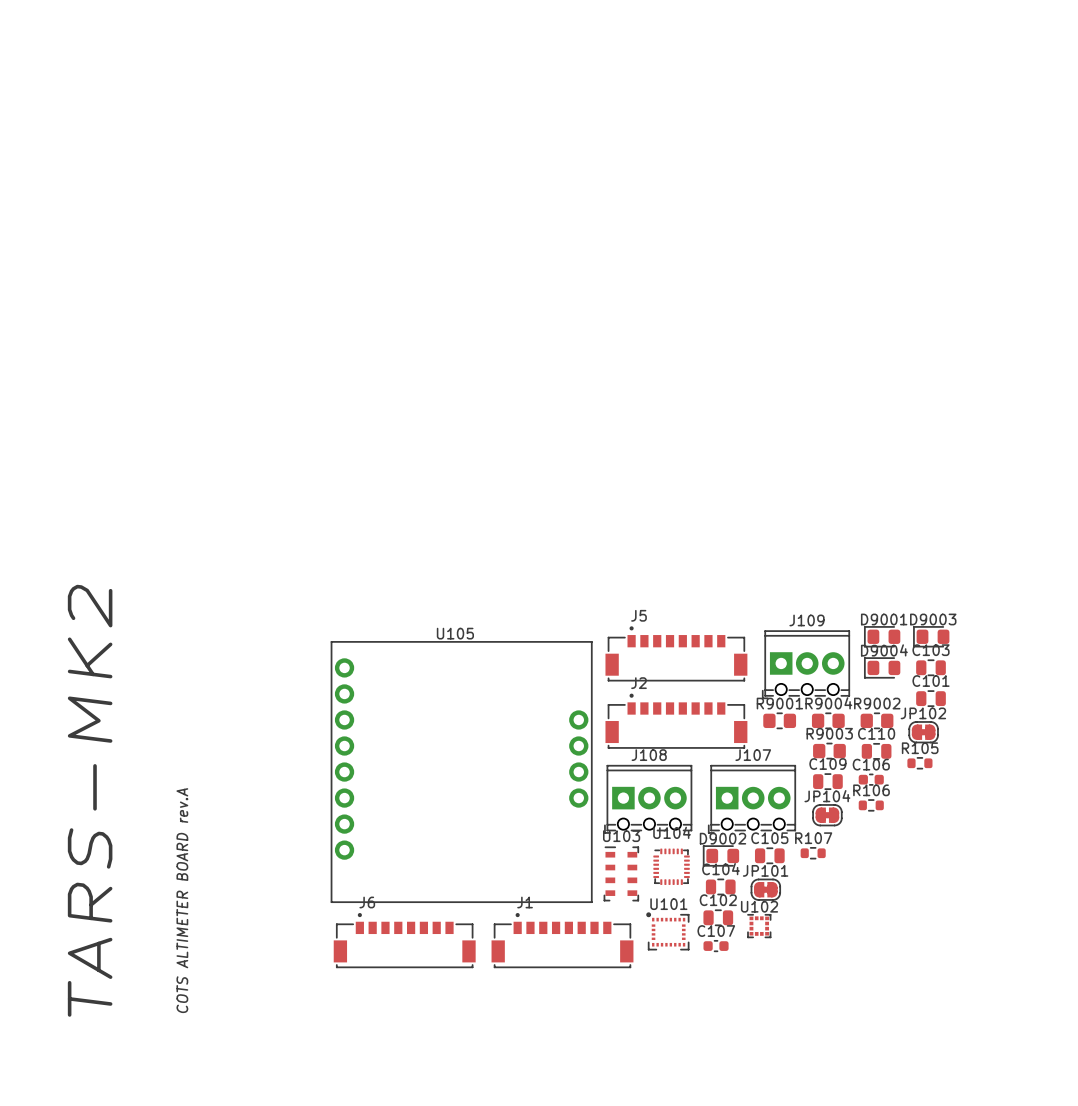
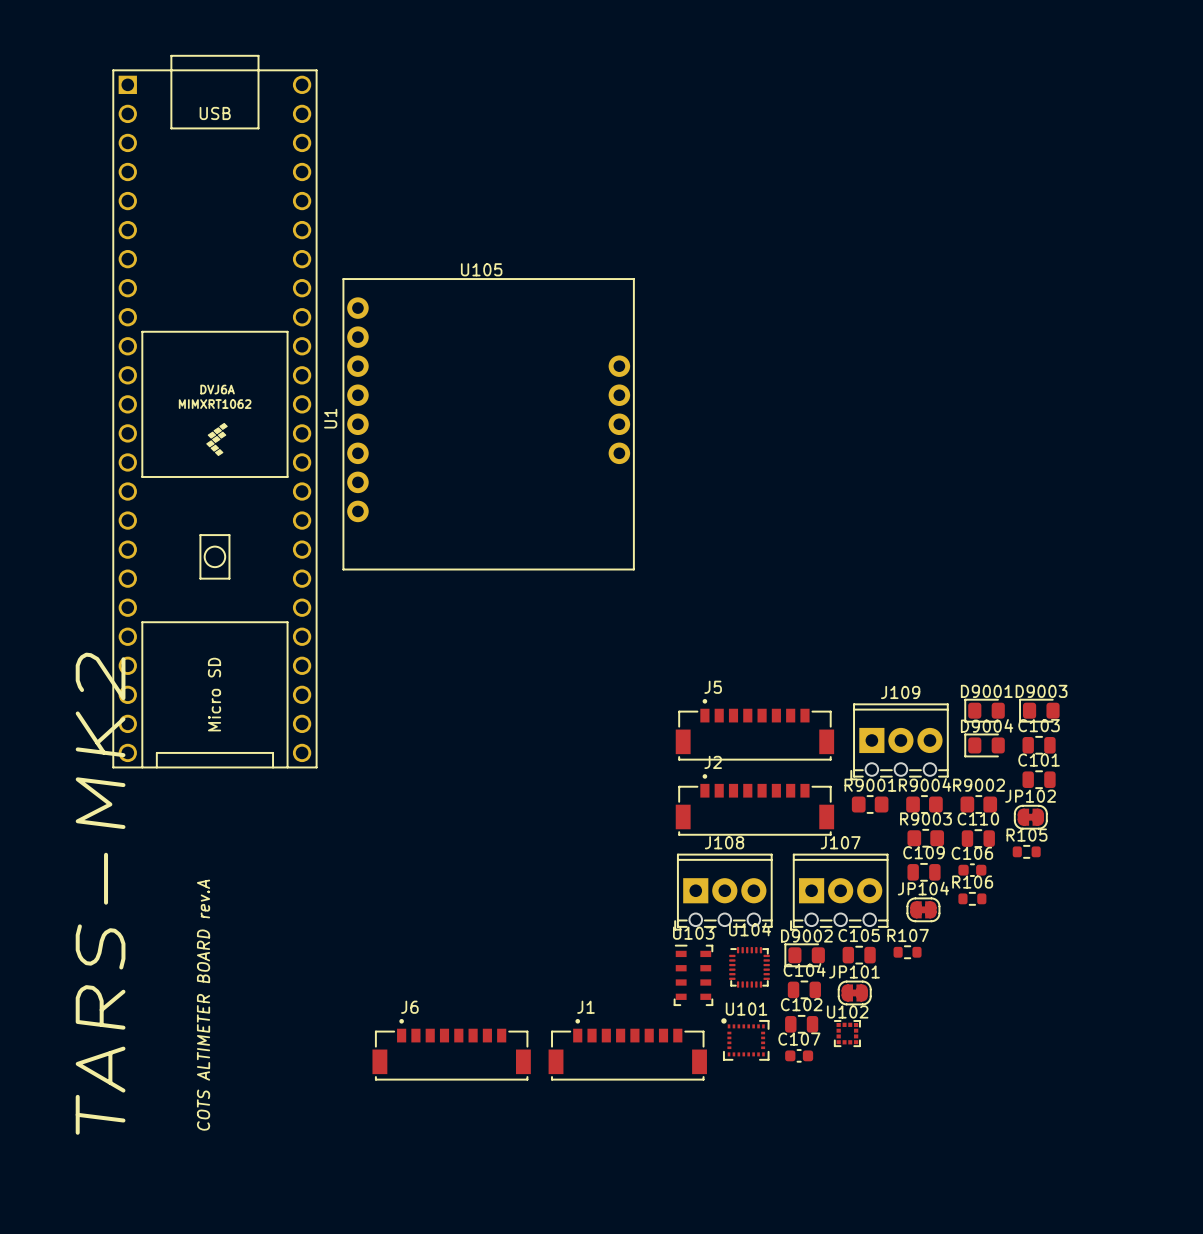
U1: none -> (214, 411)
U105 position: (461, 772) -> (488, 424)

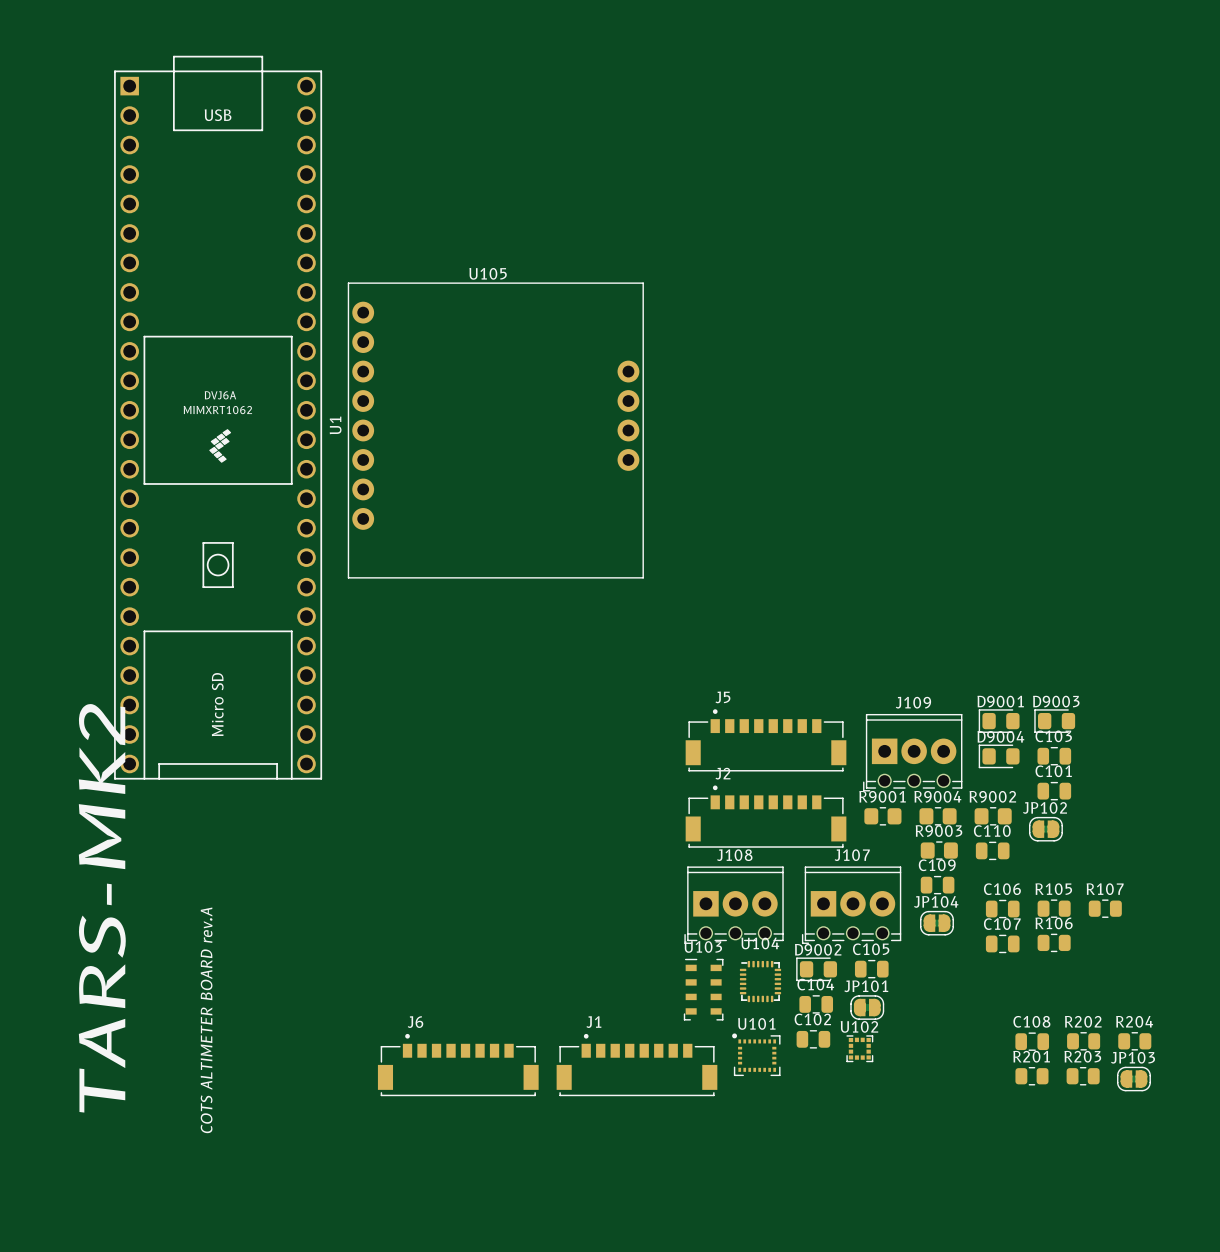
R105 footprint: [1012, 845, 1041, 859] -> [1037, 899, 1071, 918]
C106 footprint: [958, 863, 987, 877] -> [985, 899, 1020, 919]
R106 footprint: [958, 892, 987, 906] -> [1037, 933, 1071, 953]
R107 footprint: [893, 945, 922, 959] -> [1088, 899, 1122, 918]
C108: none -> (1032, 1041)
R202: none -> (1083, 1041)
R204: none -> (1134, 1041)
C107 footprint: [785, 1049, 814, 1063] -> [985, 934, 1020, 954]
R201: none -> (1031, 1076)
R203: none -> (1083, 1076)
JP103: none -> (1133, 1079)

